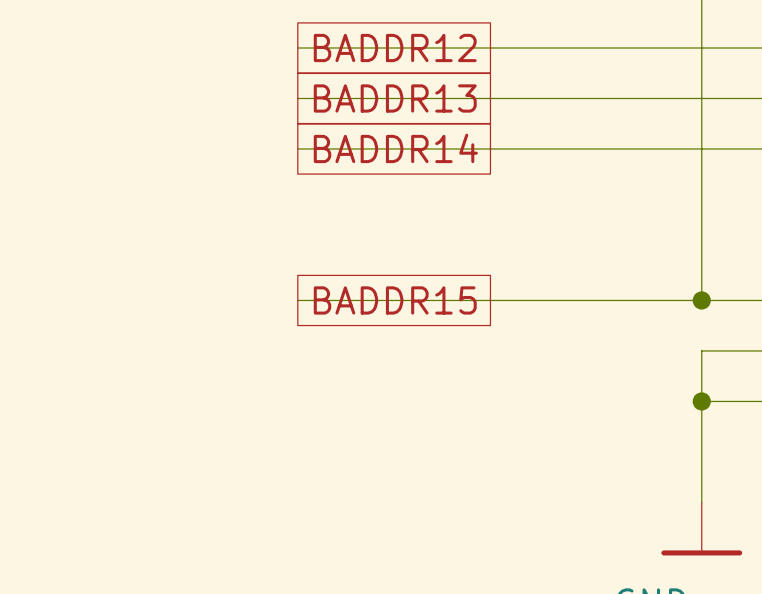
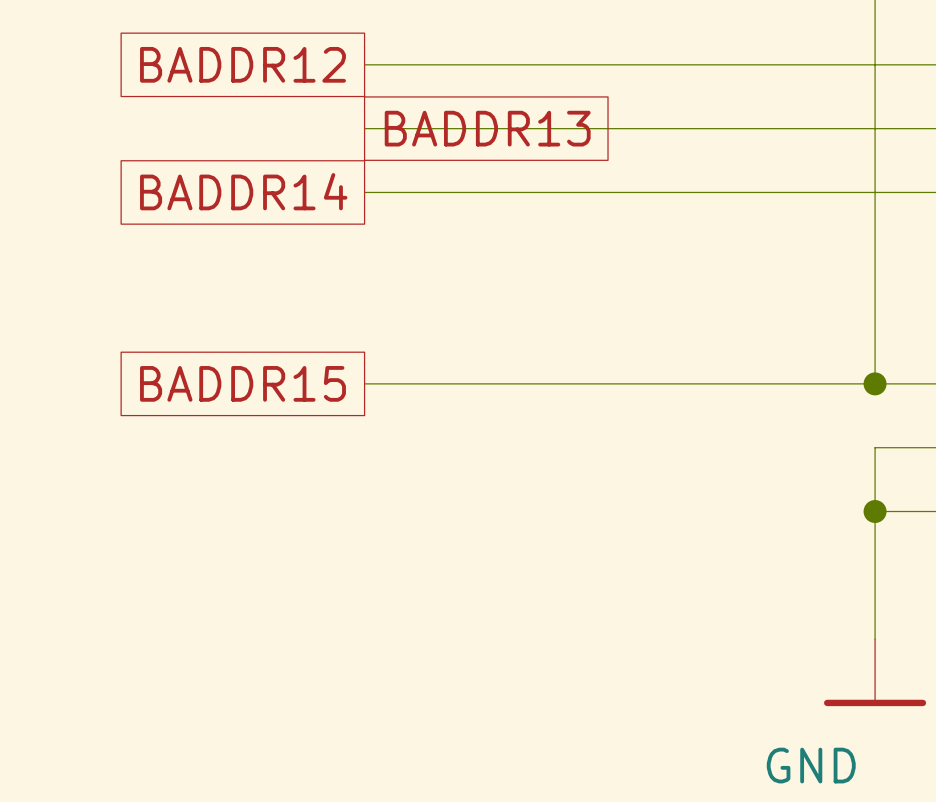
global label rotation: 0° (395, 47) -> 180° (242, 64)
global label rotation: 0° (395, 148) -> 180° (243, 191)
global label rotation: 0° (395, 300) -> 180° (242, 383)

